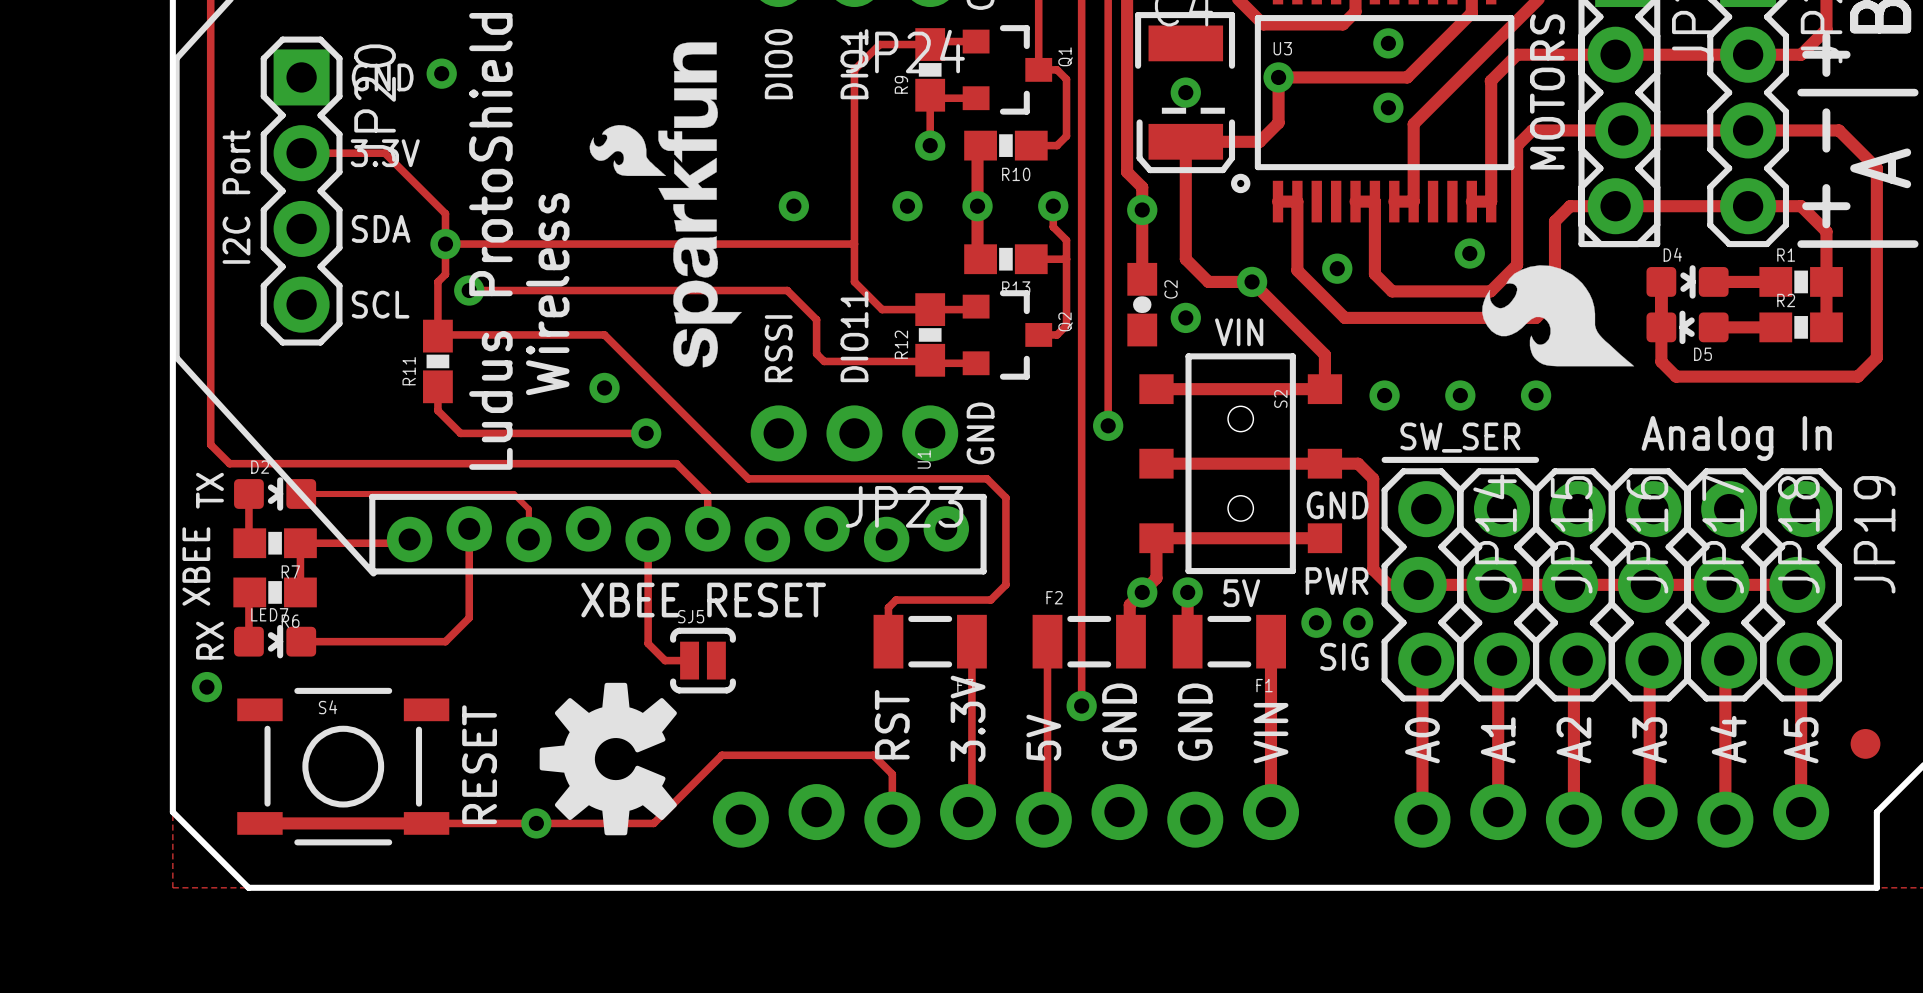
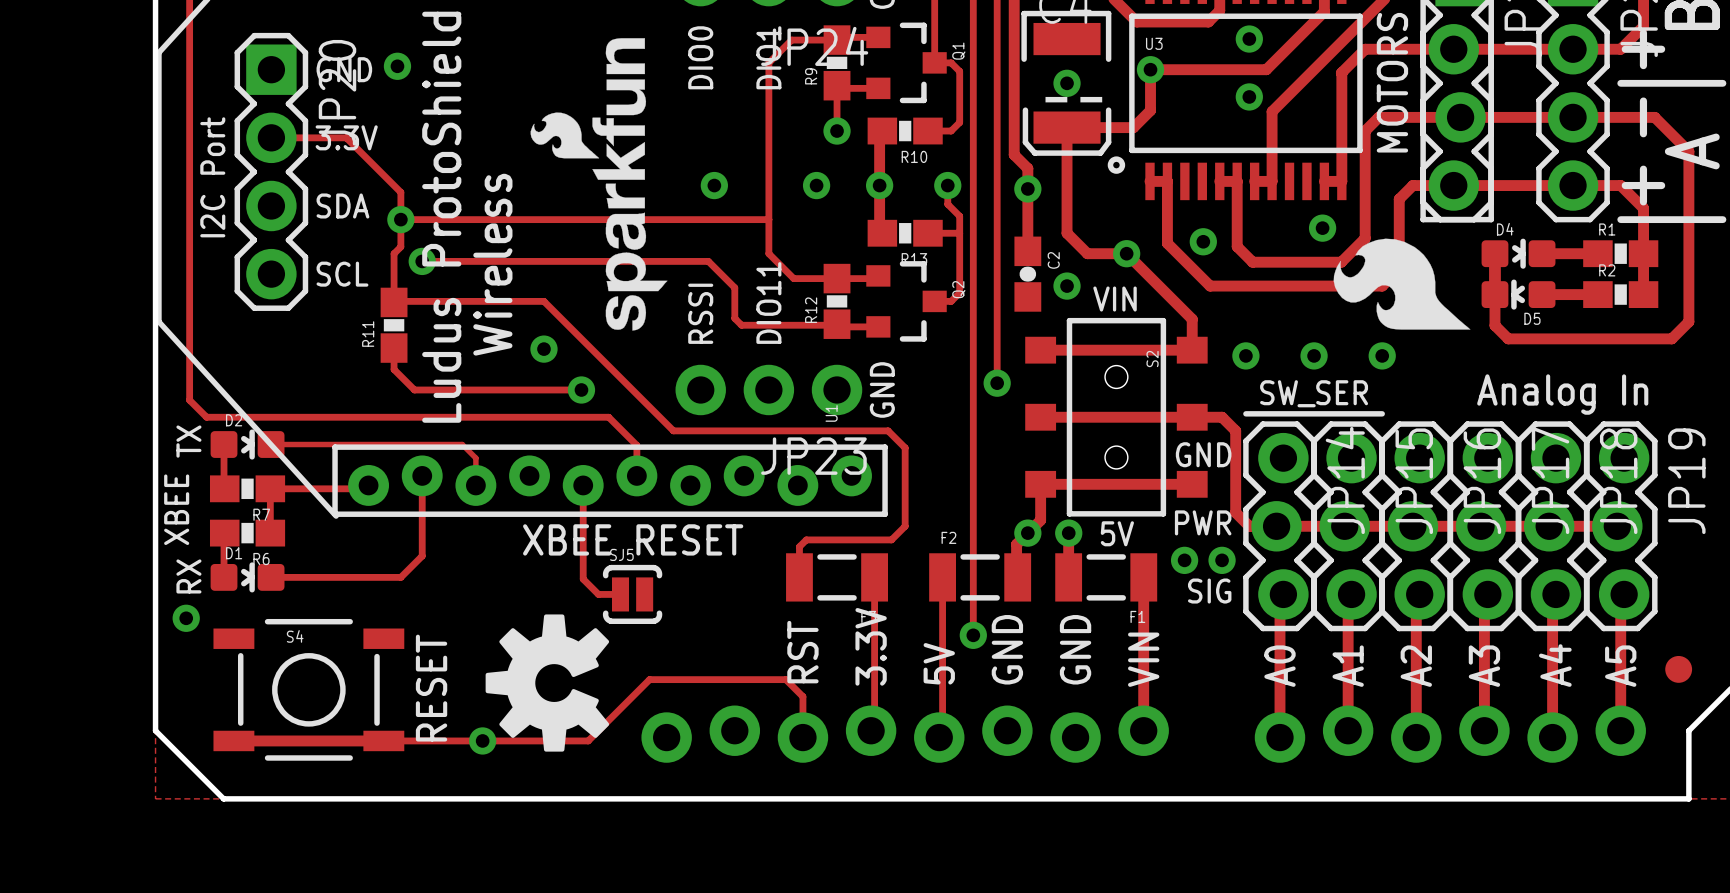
LED7 name: LED7 (269, 614) -> D1 (234, 553)

